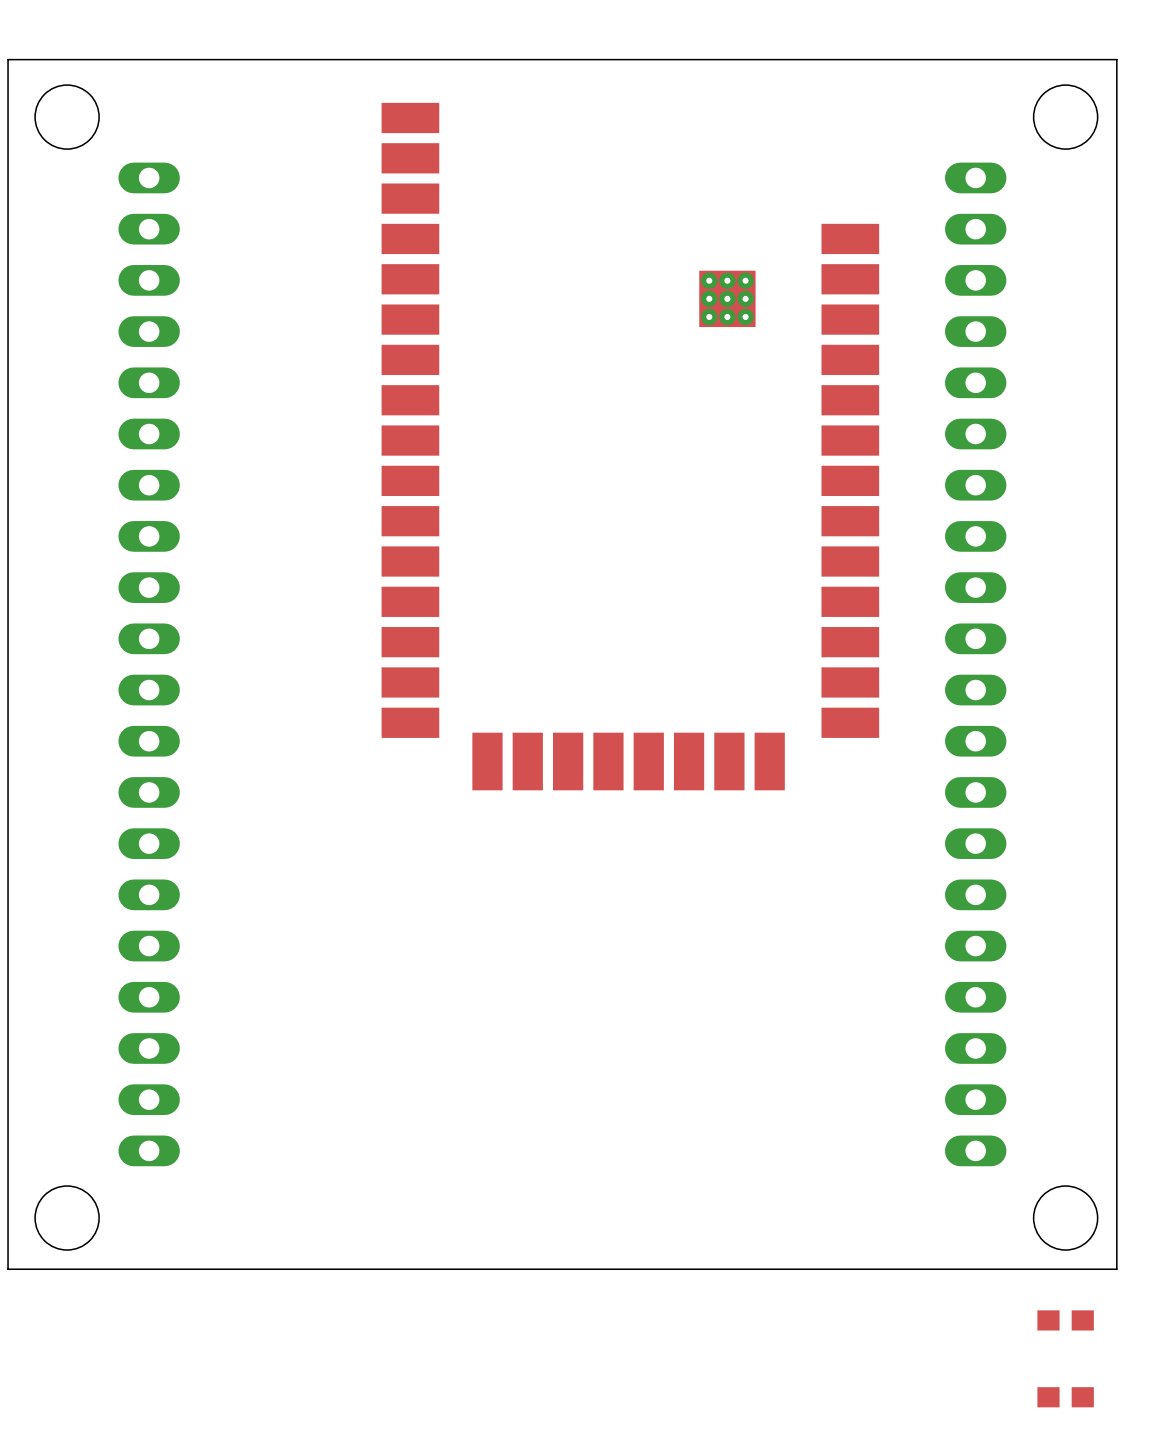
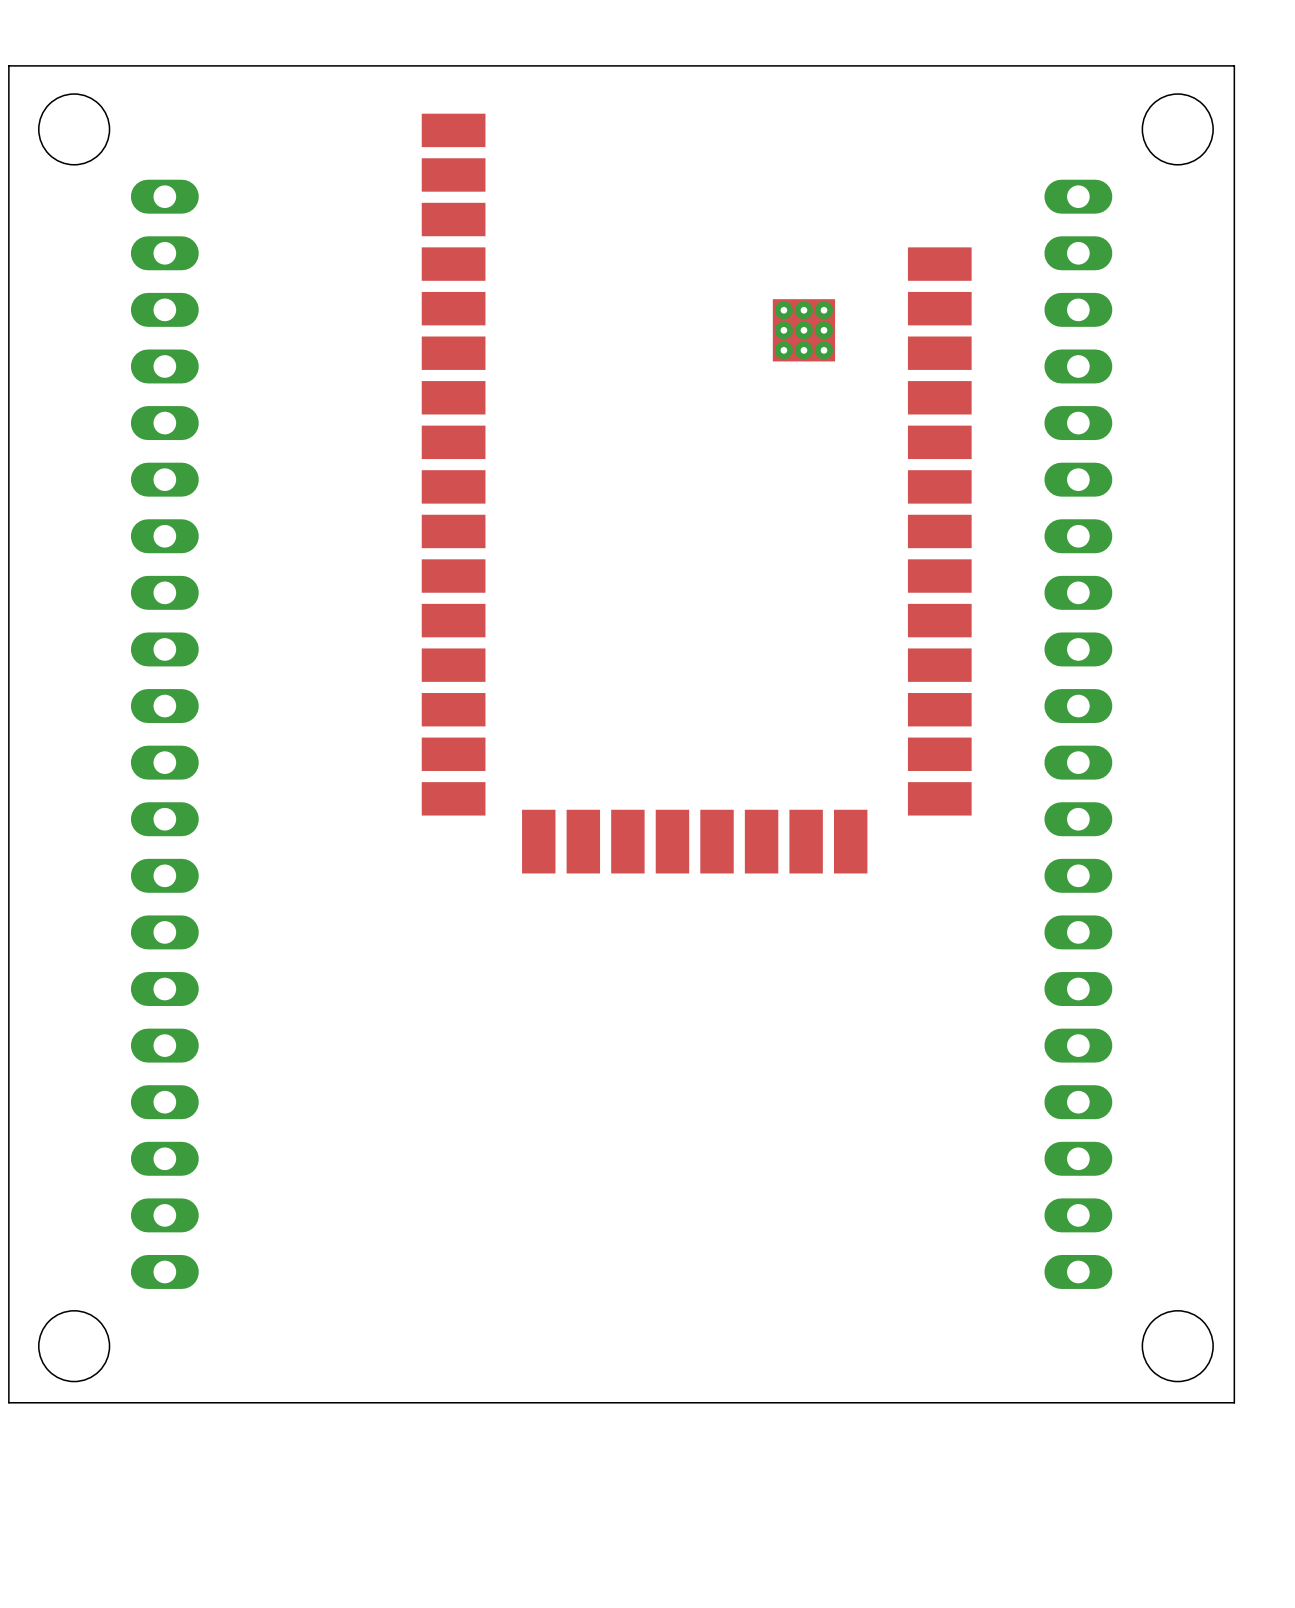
part: (1065, 1320) -> none
part: (1065, 1397) -> none

